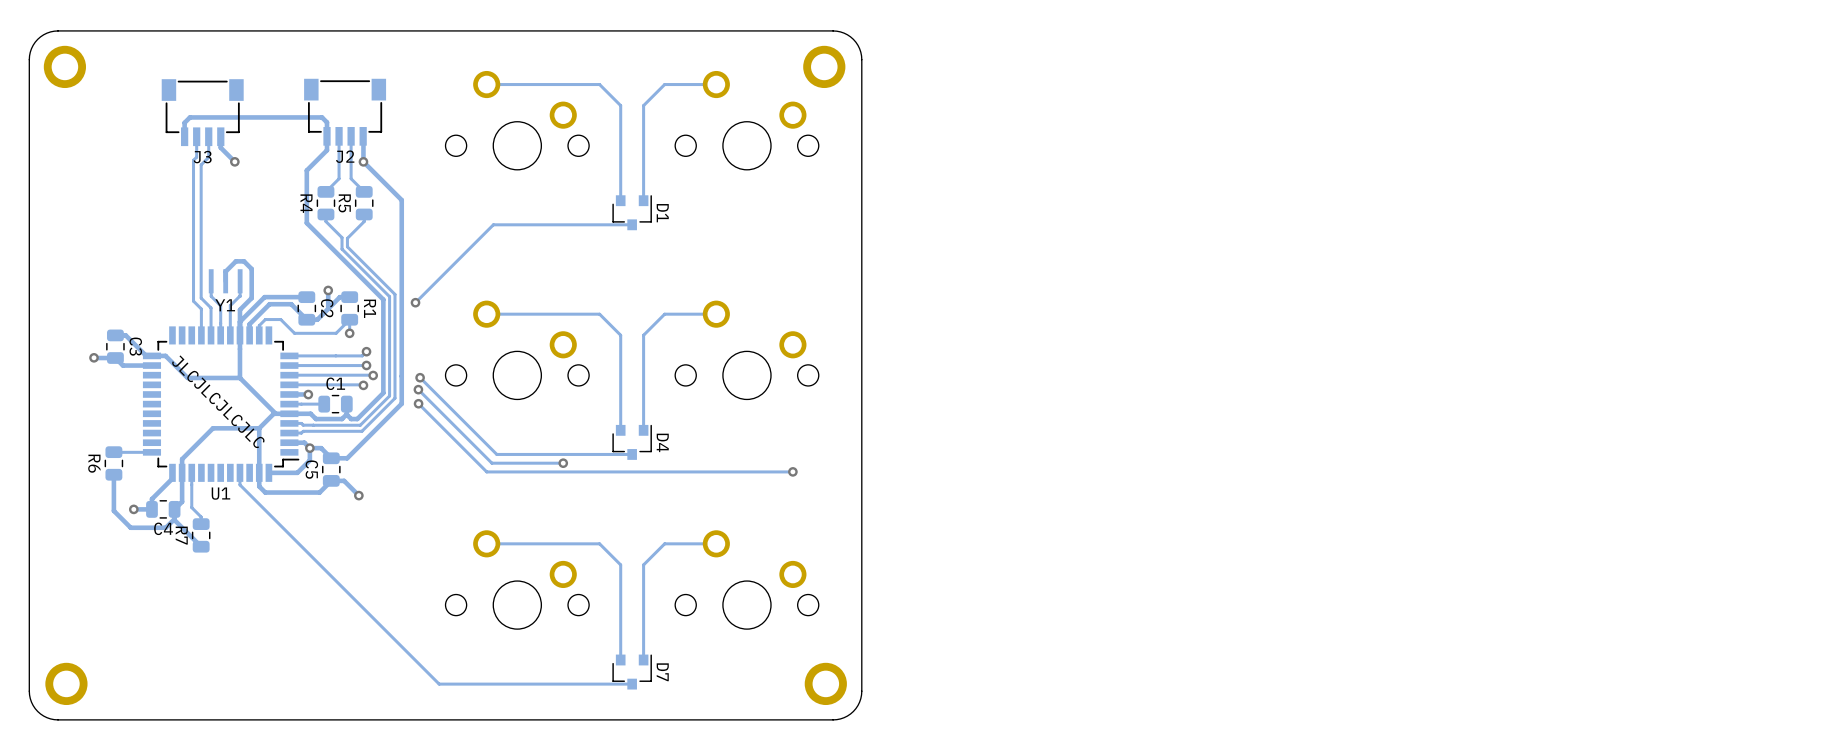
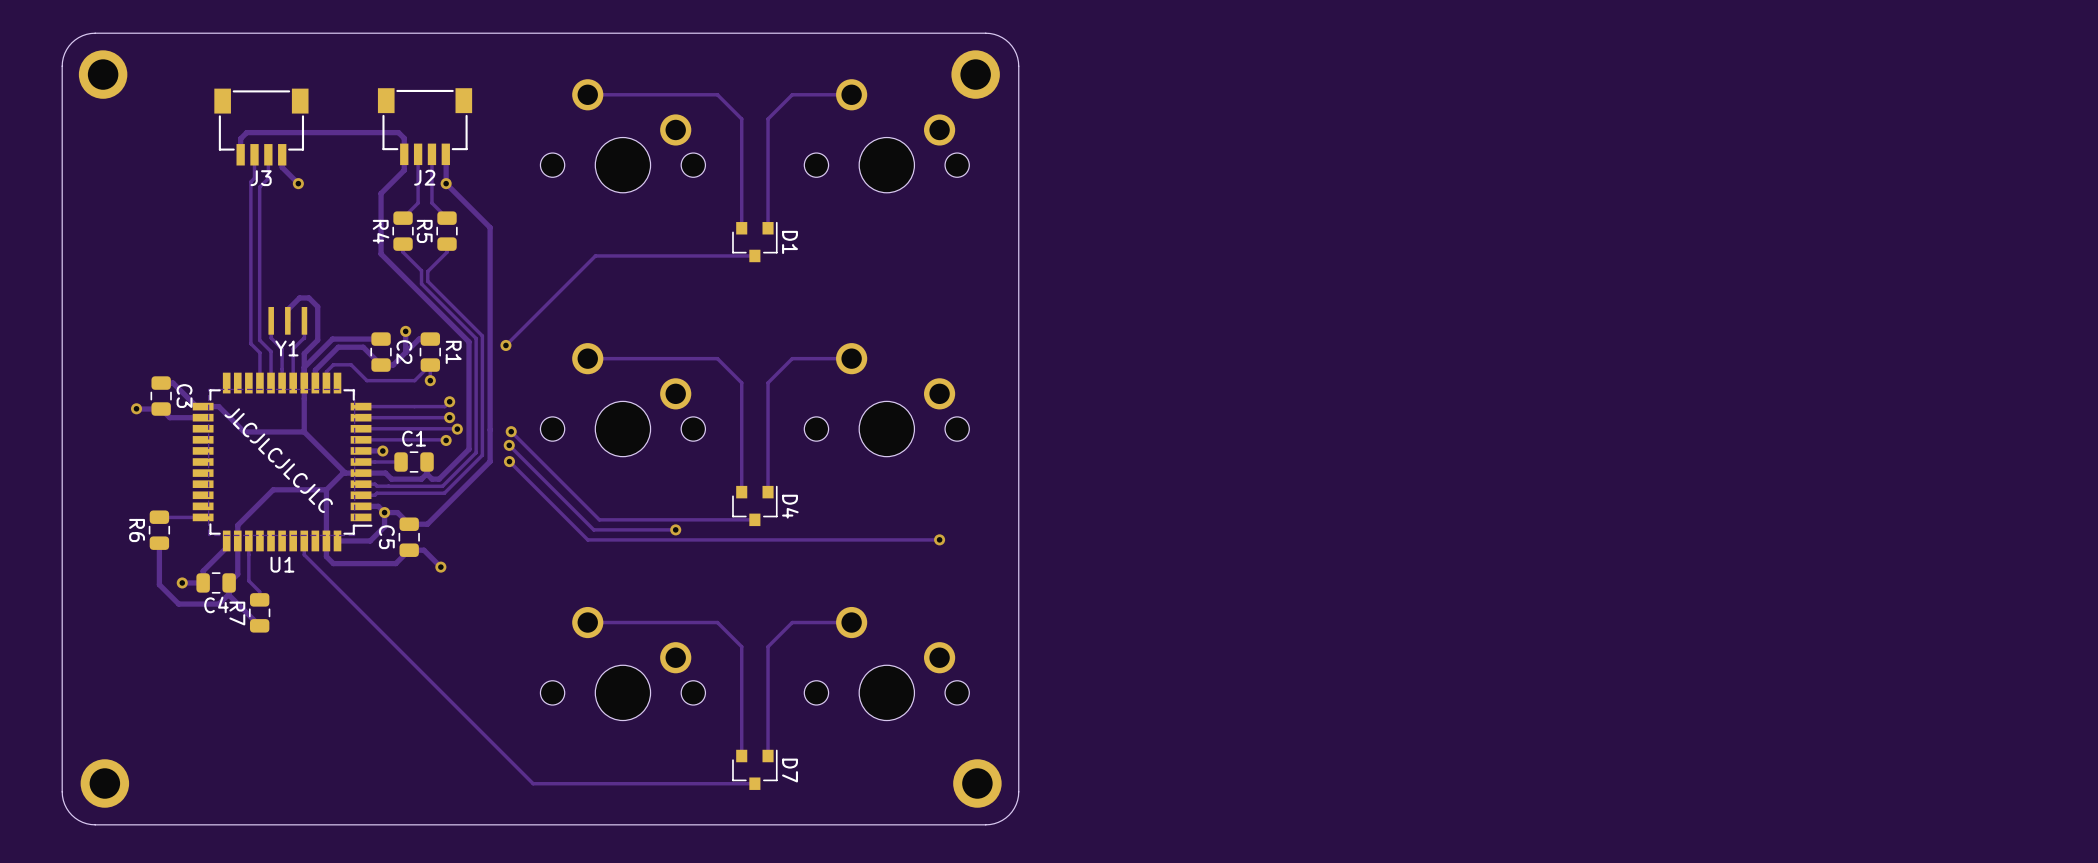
zone outline: none -> (354, 389) (354, 535) (208, 535) (208, 389) (354, 389)

